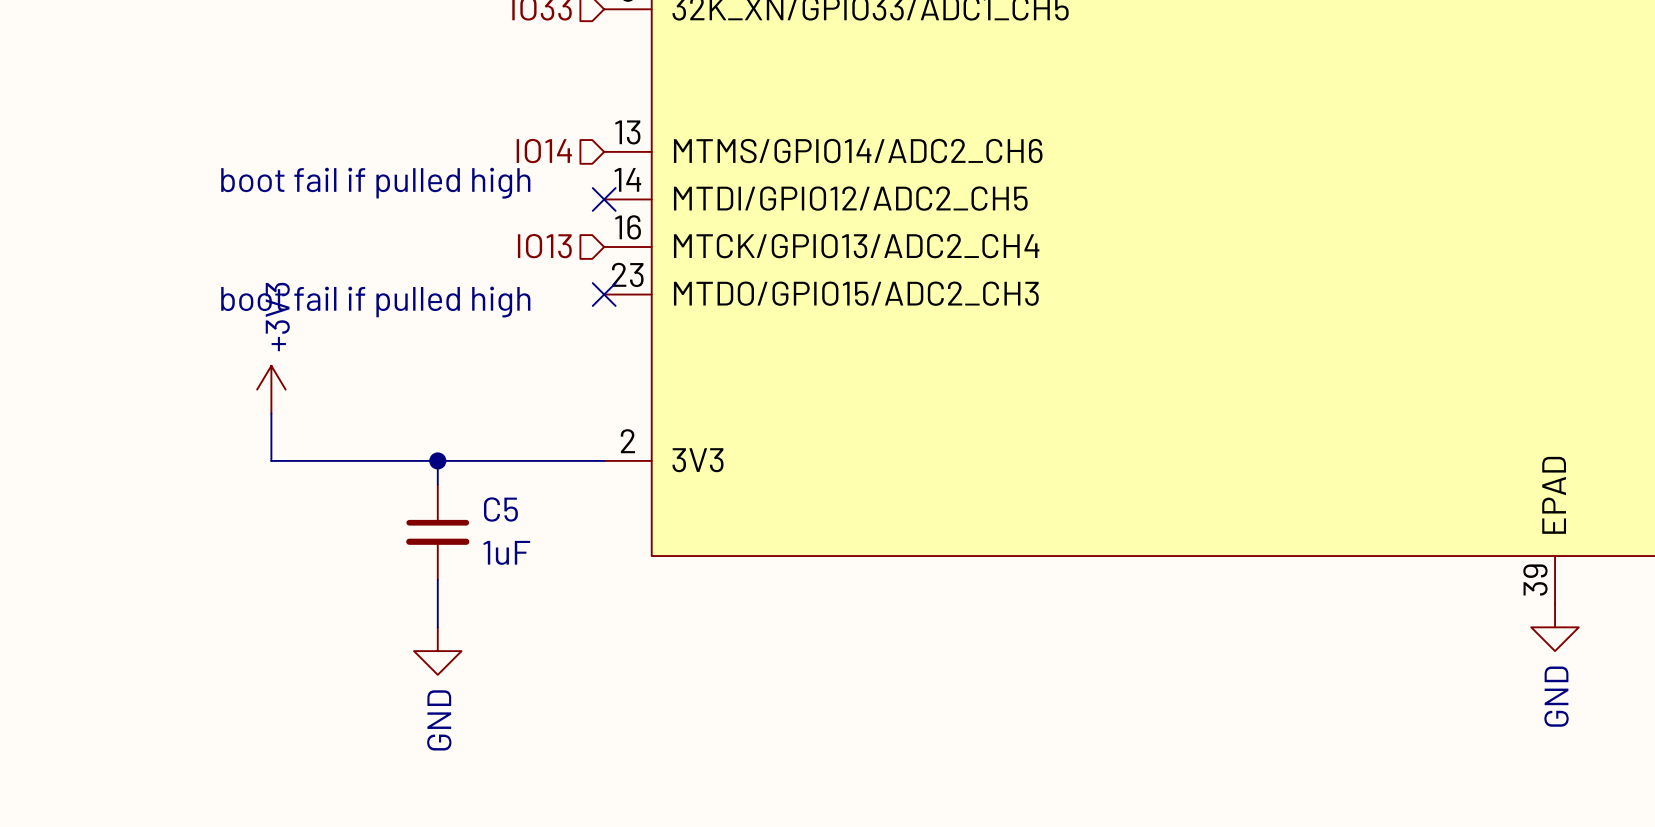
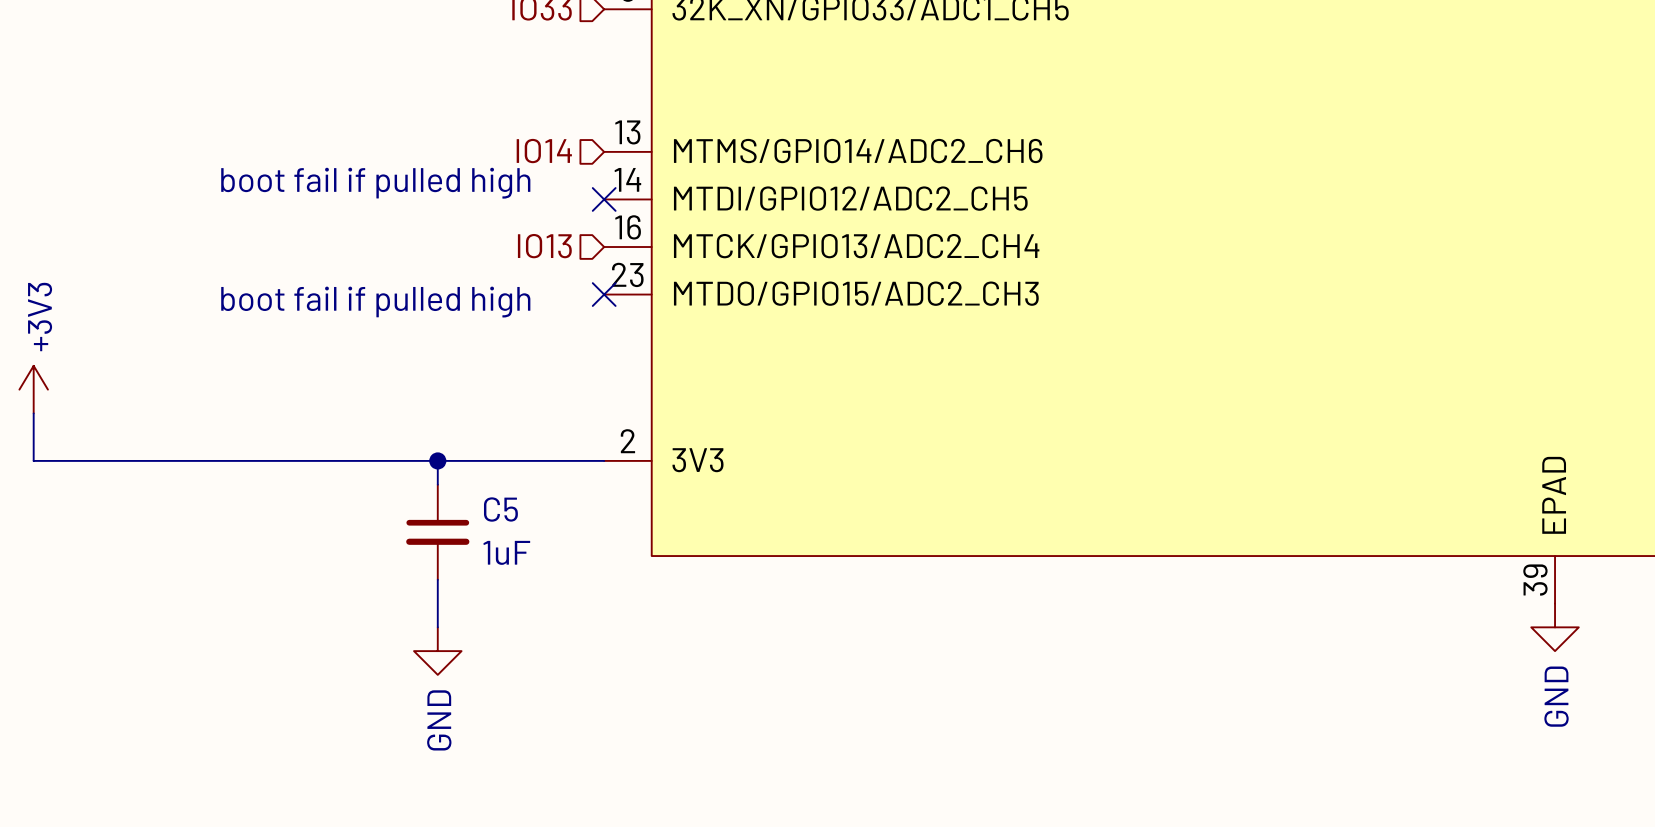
power symbol position: +3V3 (271, 389) -> +3V3 (33, 389)
wire: (271, 413) (271, 460) -> (33, 413) (33, 460) (271, 460)

